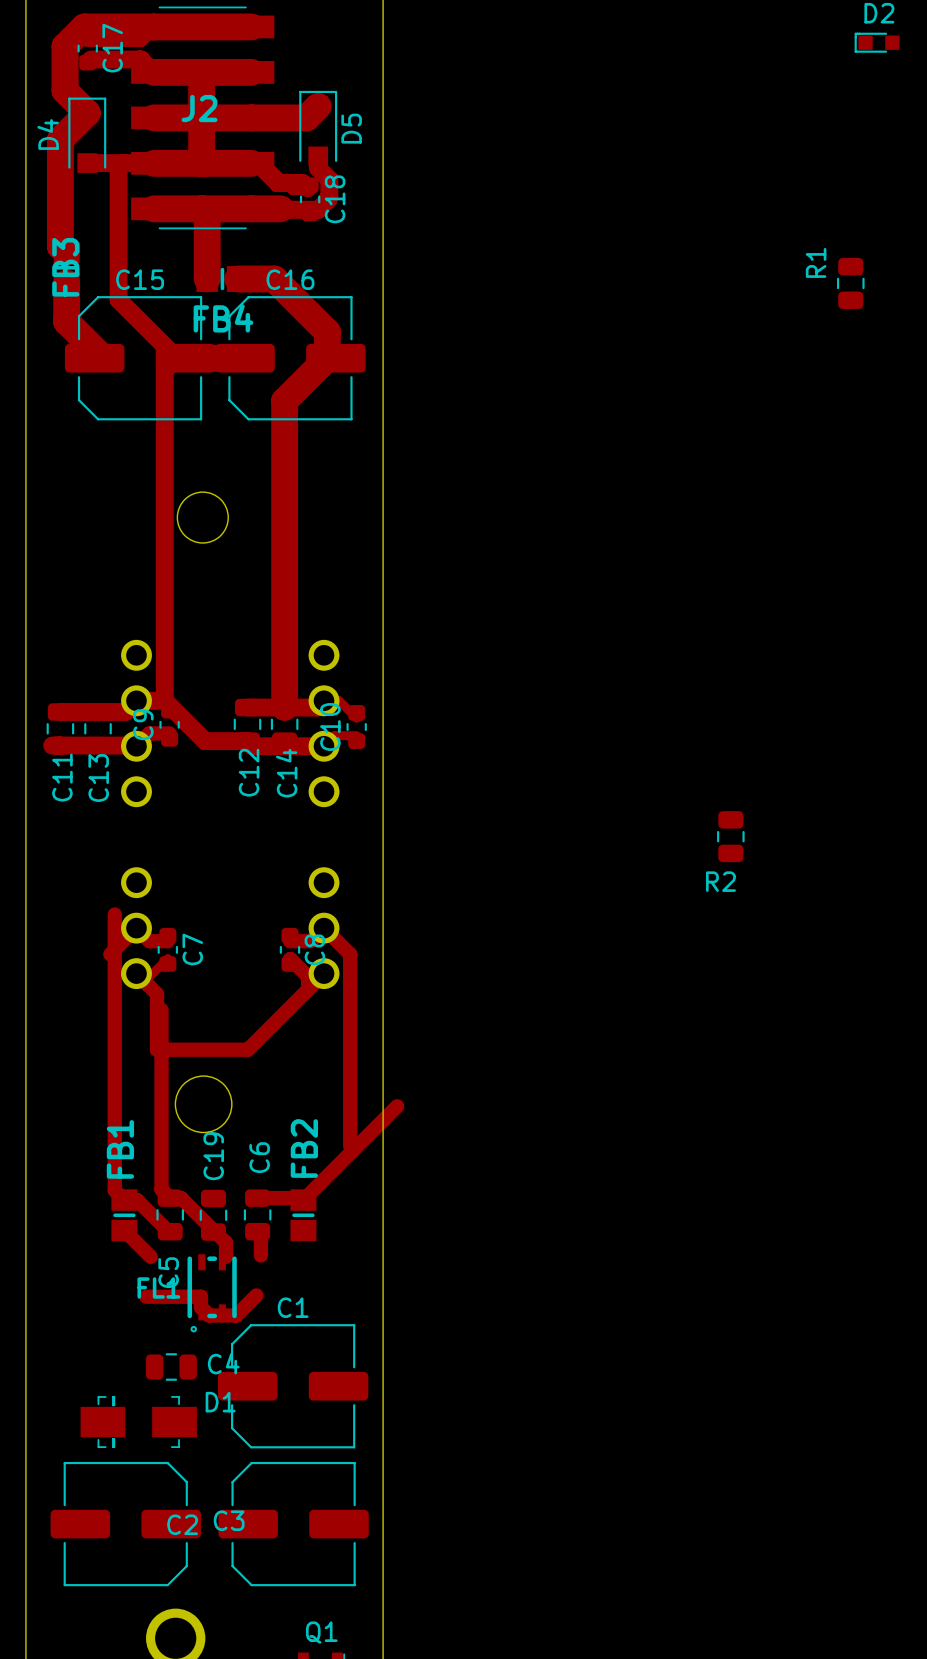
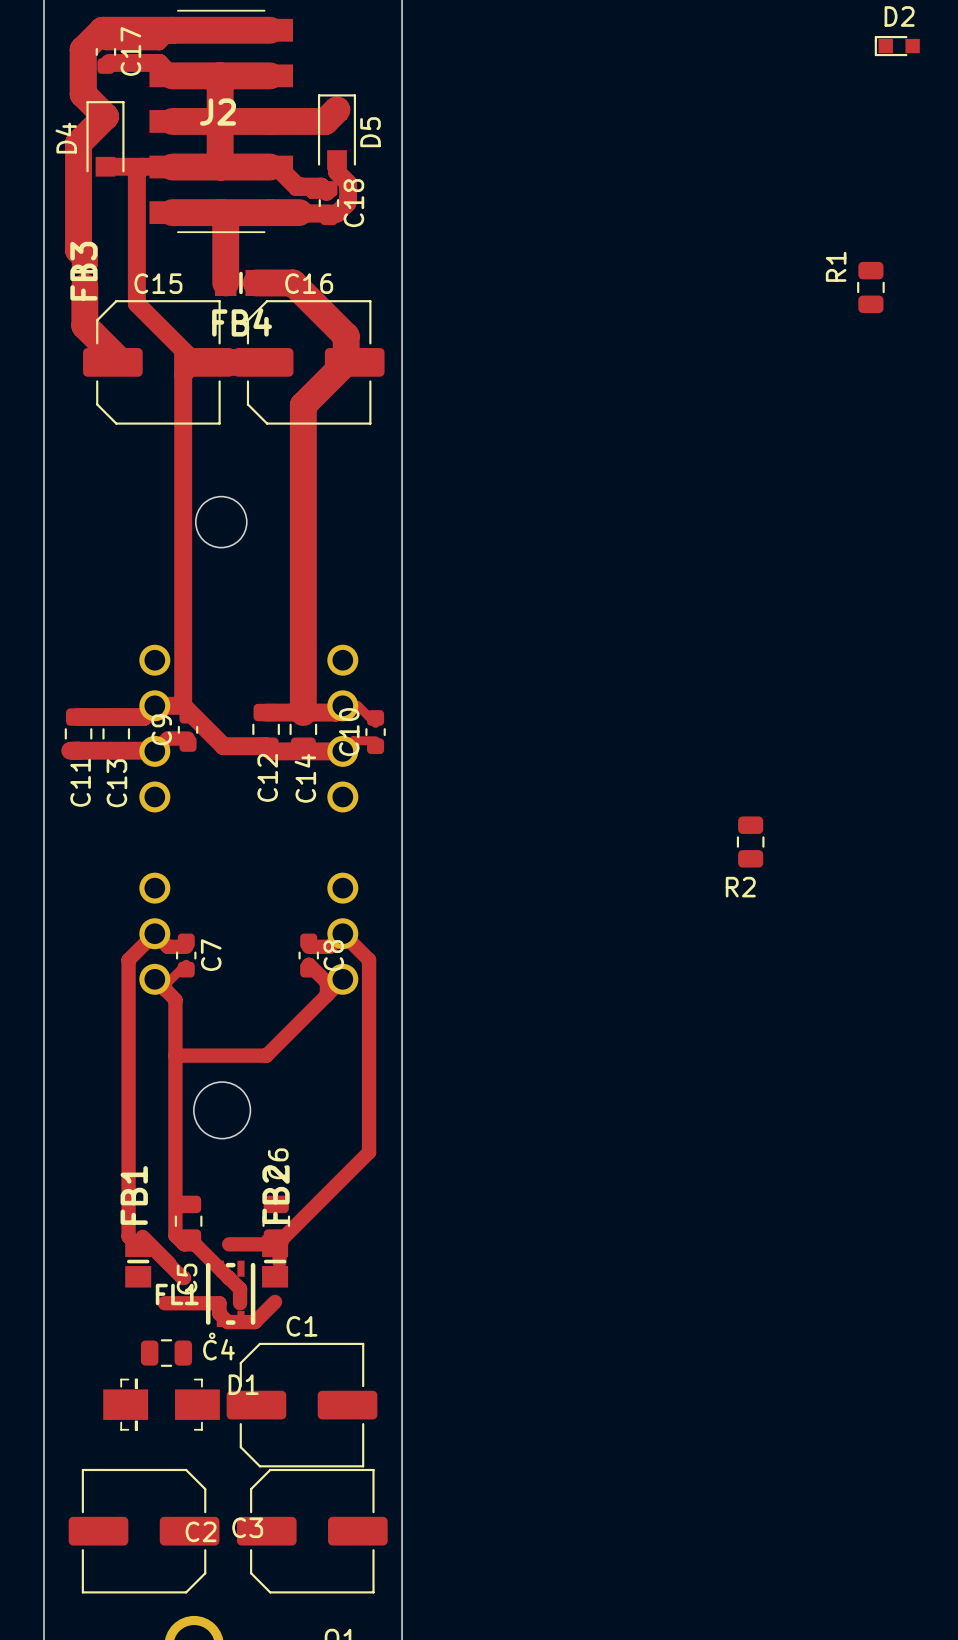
track: (114, 914) (114, 1190) (124, 1200) (137, 1200) (170, 1231) -> (128, 959) (128, 1236) (138, 1246) (150, 1246) (184, 1278)
track: (161, 1009) (161, 1189) (170, 1198) (181, 1198) (214, 1231) -> (175, 1055) (175, 1235) (184, 1244) (195, 1244) (228, 1278)
track: (397, 1106) (303, 1200) (301, 1198) (257, 1198) -> (369, 1152) (275, 1246) (273, 1244) (229, 1244)
FB1 position: (124, 1215) -> (138, 1261)
C19: (213, 1215) -> none
FB2 position: (303, 1215) -> (275, 1261)
track: (215, 1231) (226, 1242) (226, 1256) -> (229, 1278) (240, 1288) (240, 1303)
C4 position: (171, 1366) -> (166, 1353)
C1 position: (293, 1386) -> (301, 1405)
D1 position: (138, 1422) -> (161, 1404)

